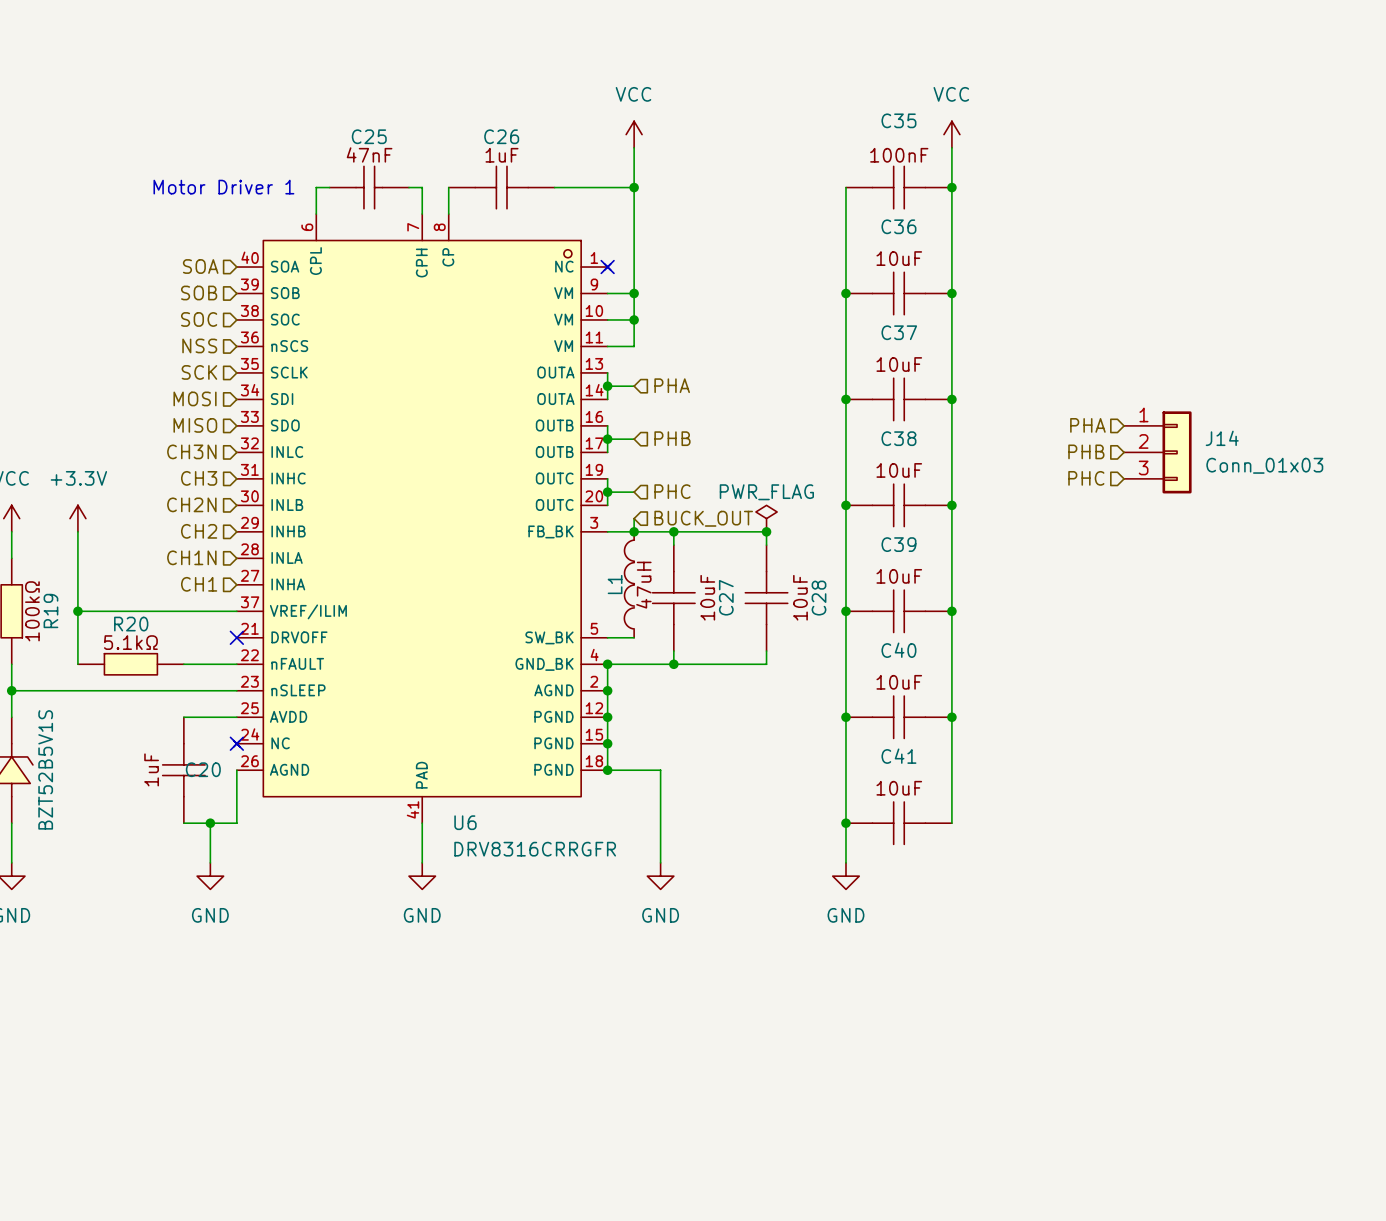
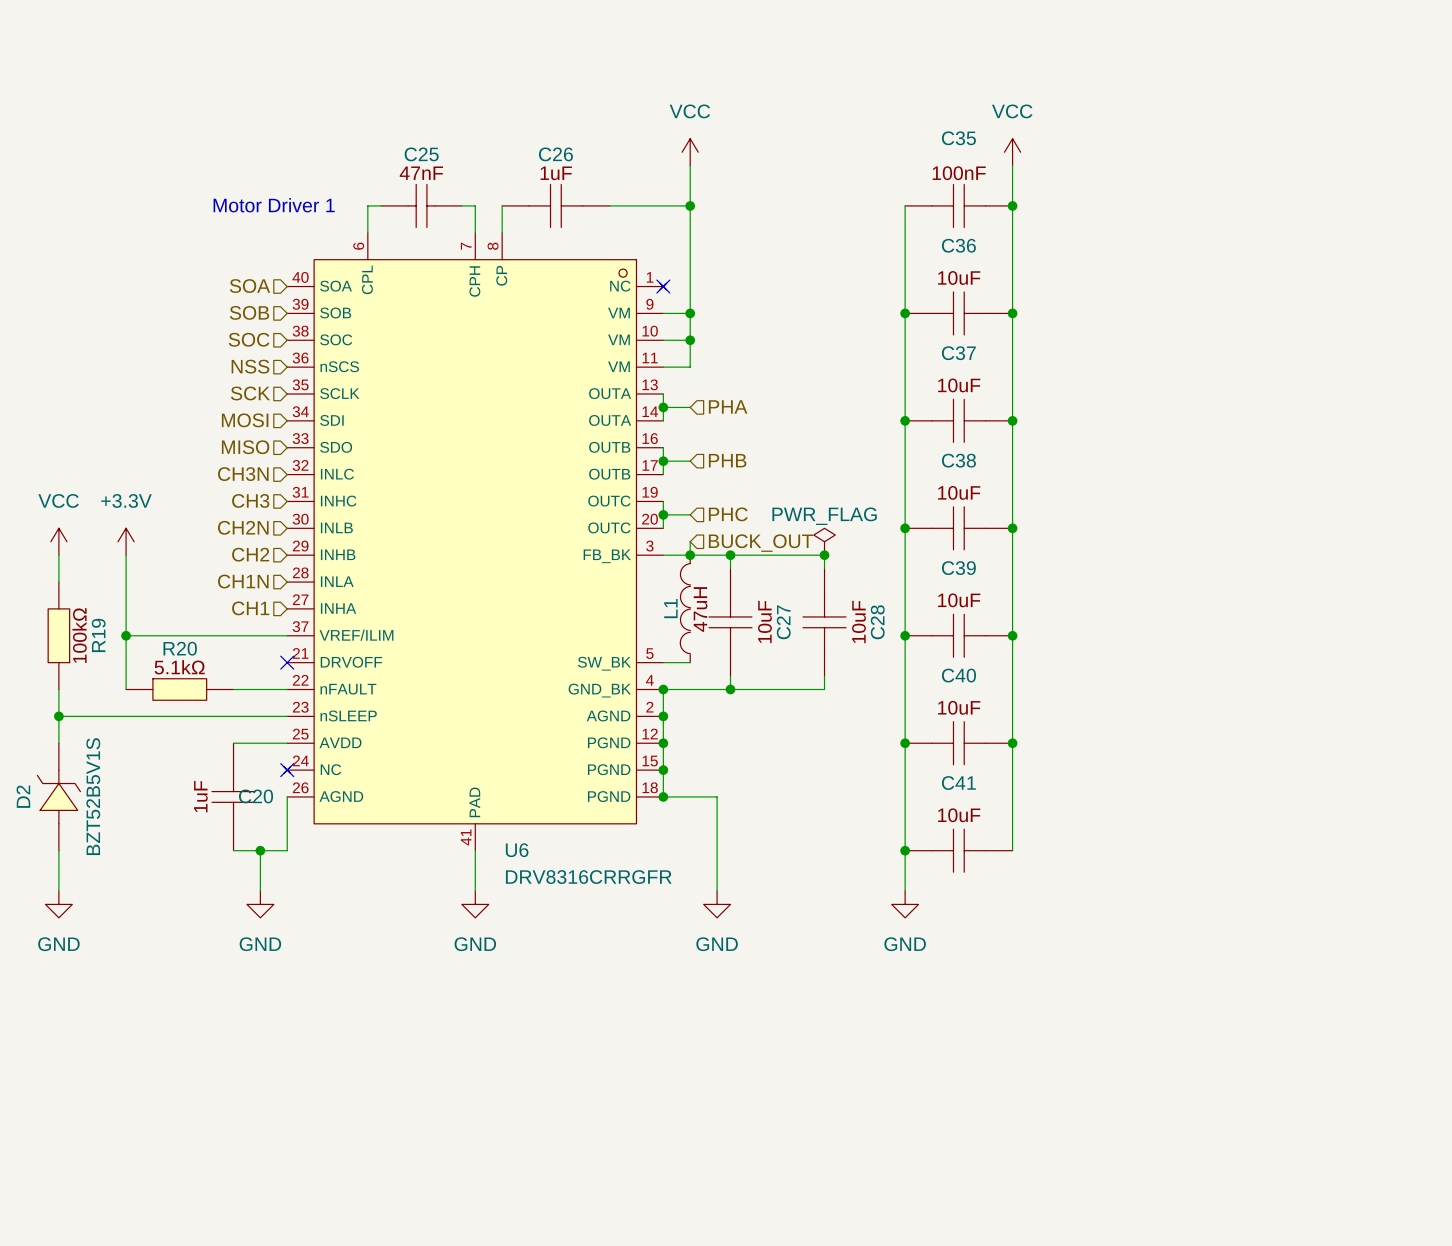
hierarchical label: PHA (1087, 425) -> none
hierarchical label: PHB (1086, 451) -> none
J14: Conn_01x03 (1157, 452) -> none
hierarchical label: PHC (1086, 478) -> none

